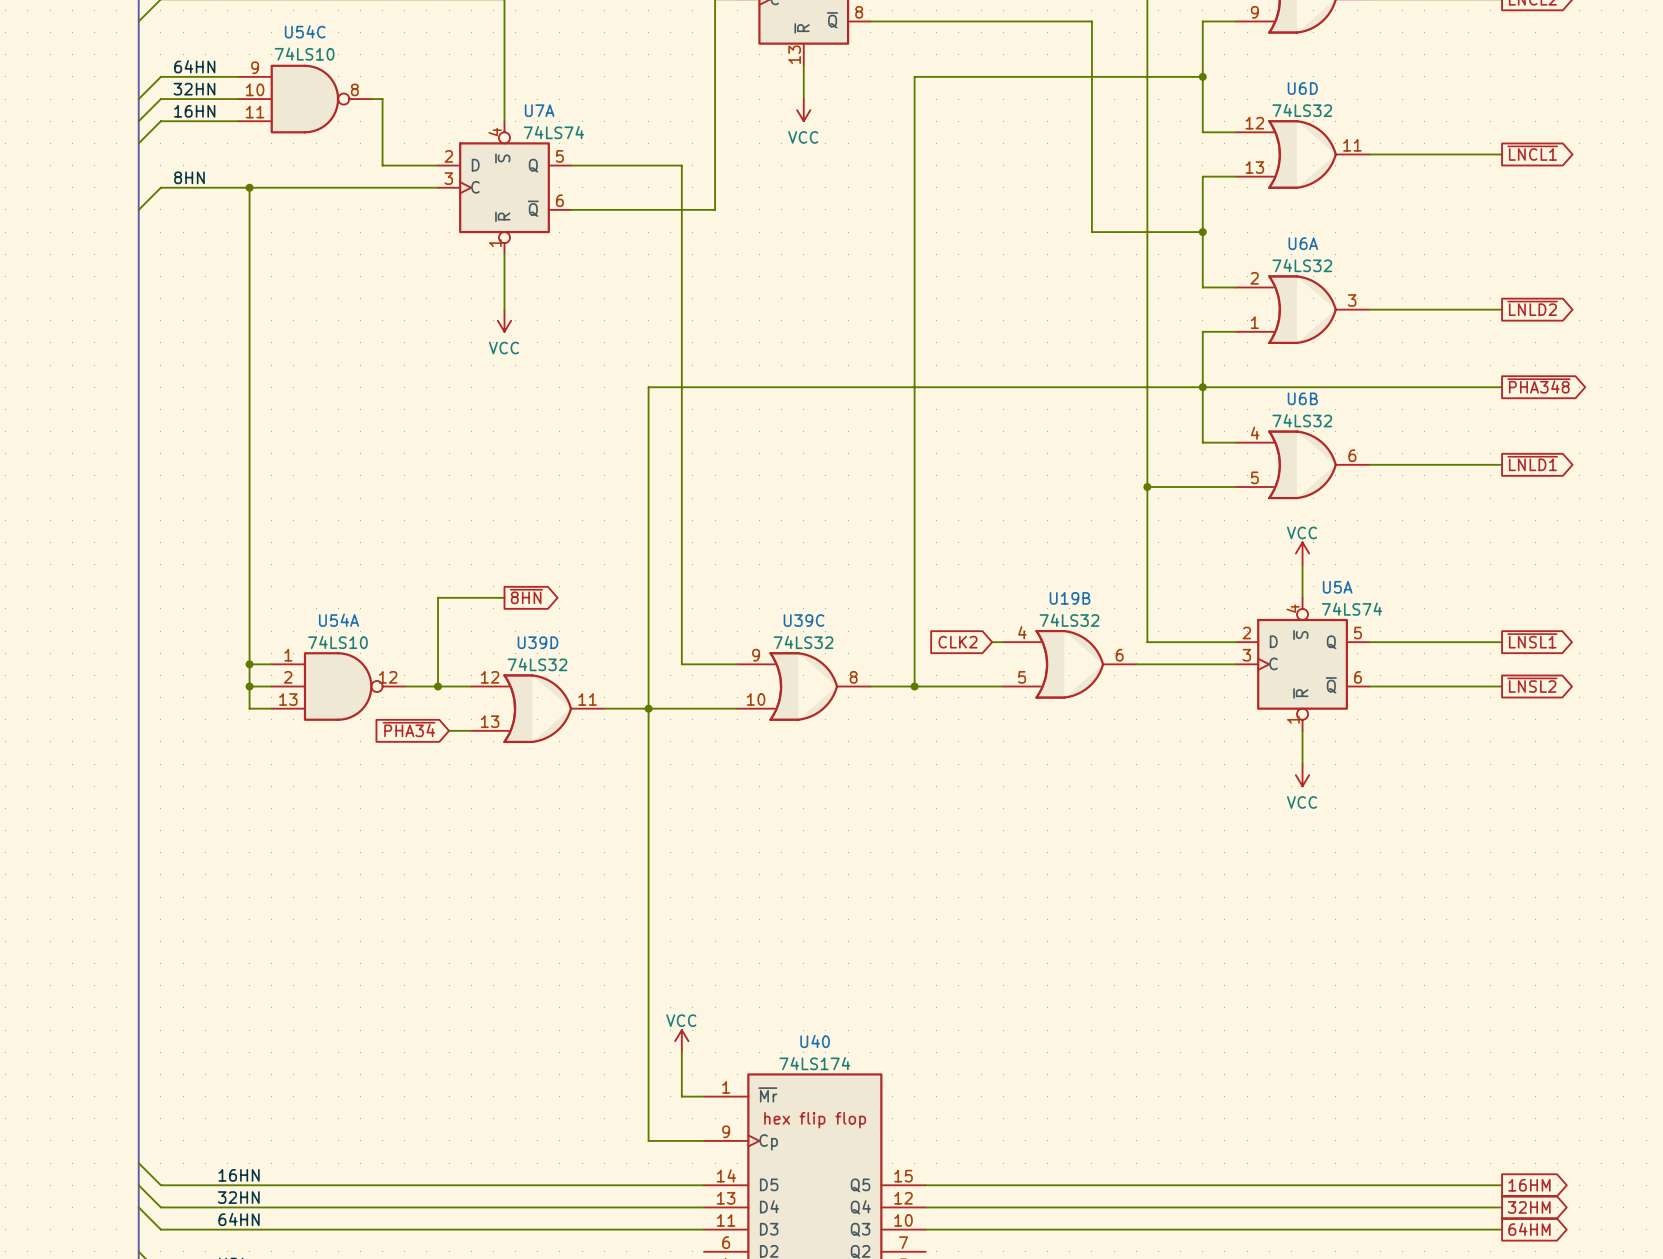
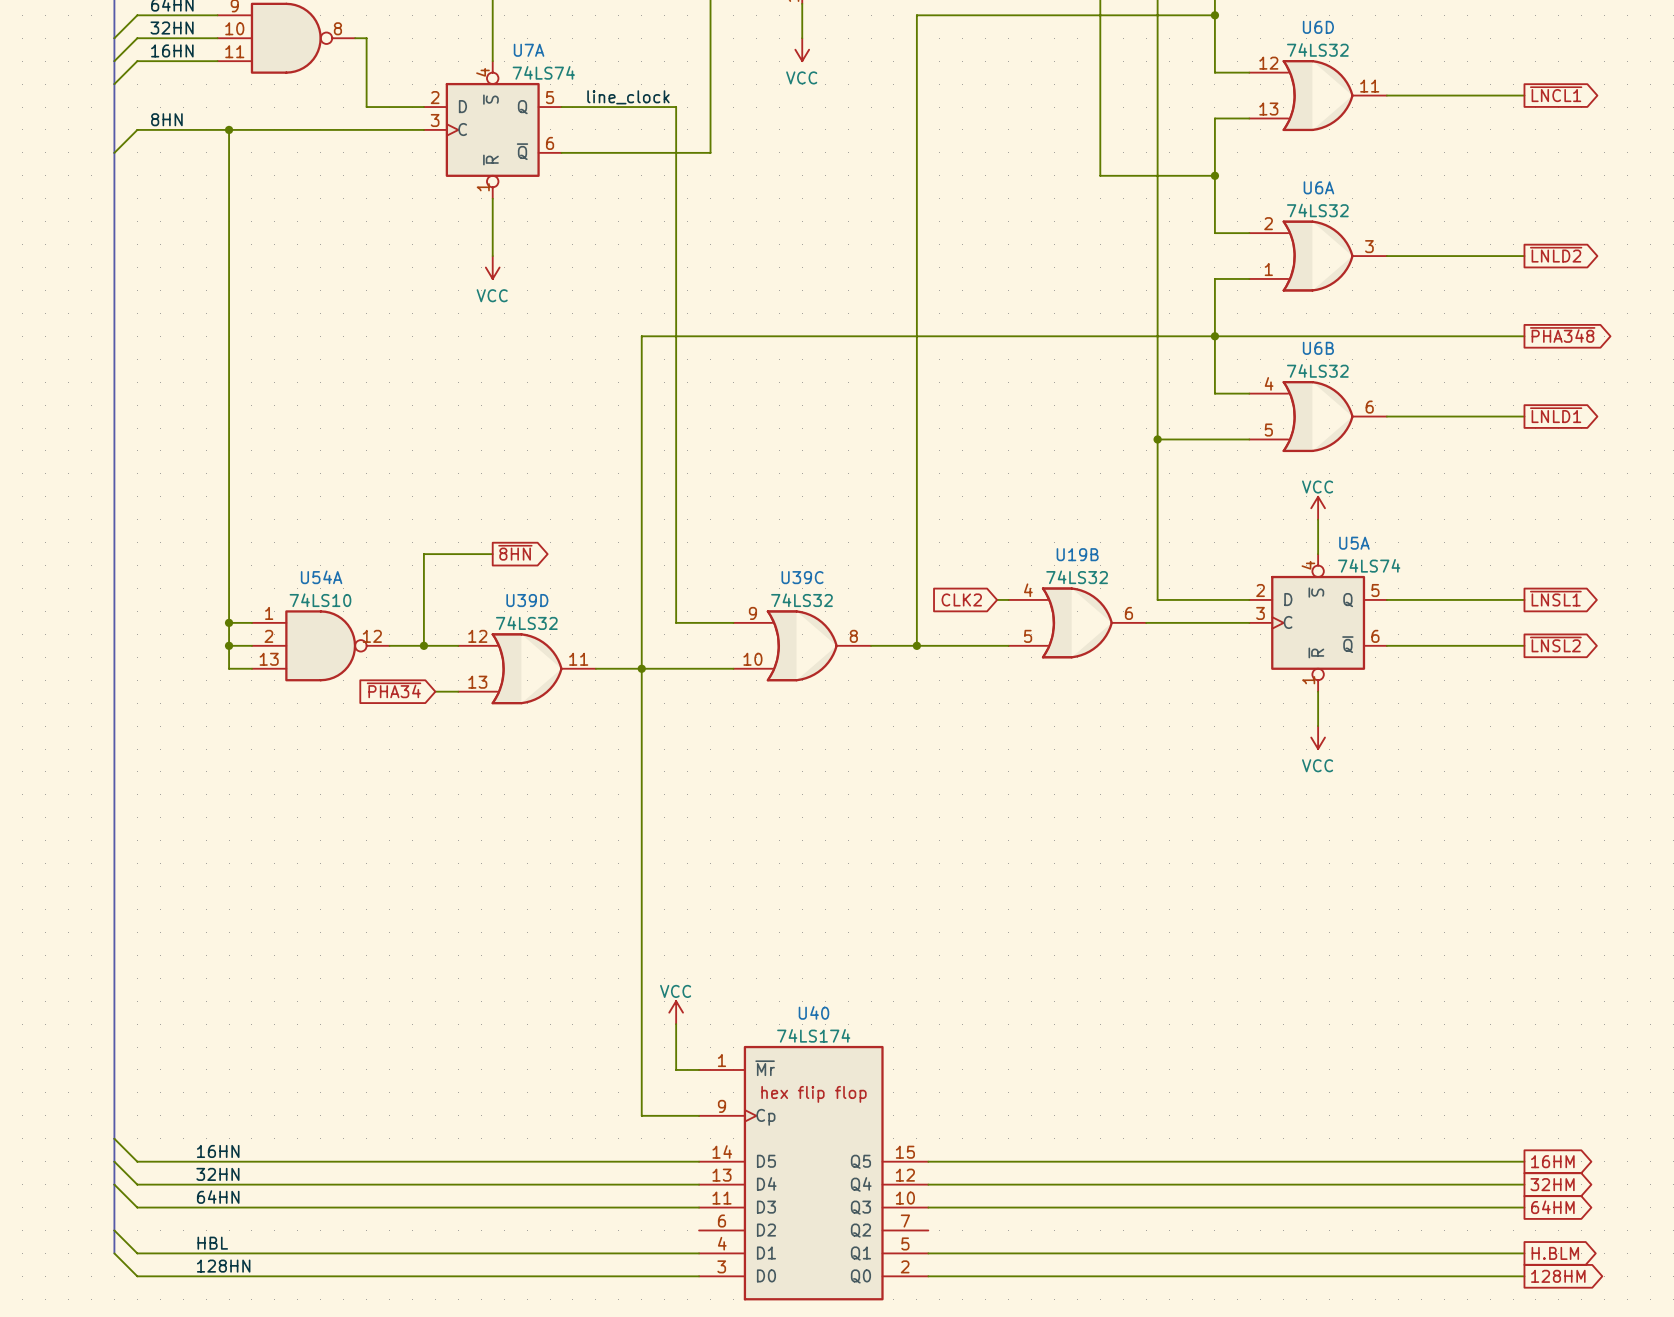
label: none -> line_clock (628, 97)

